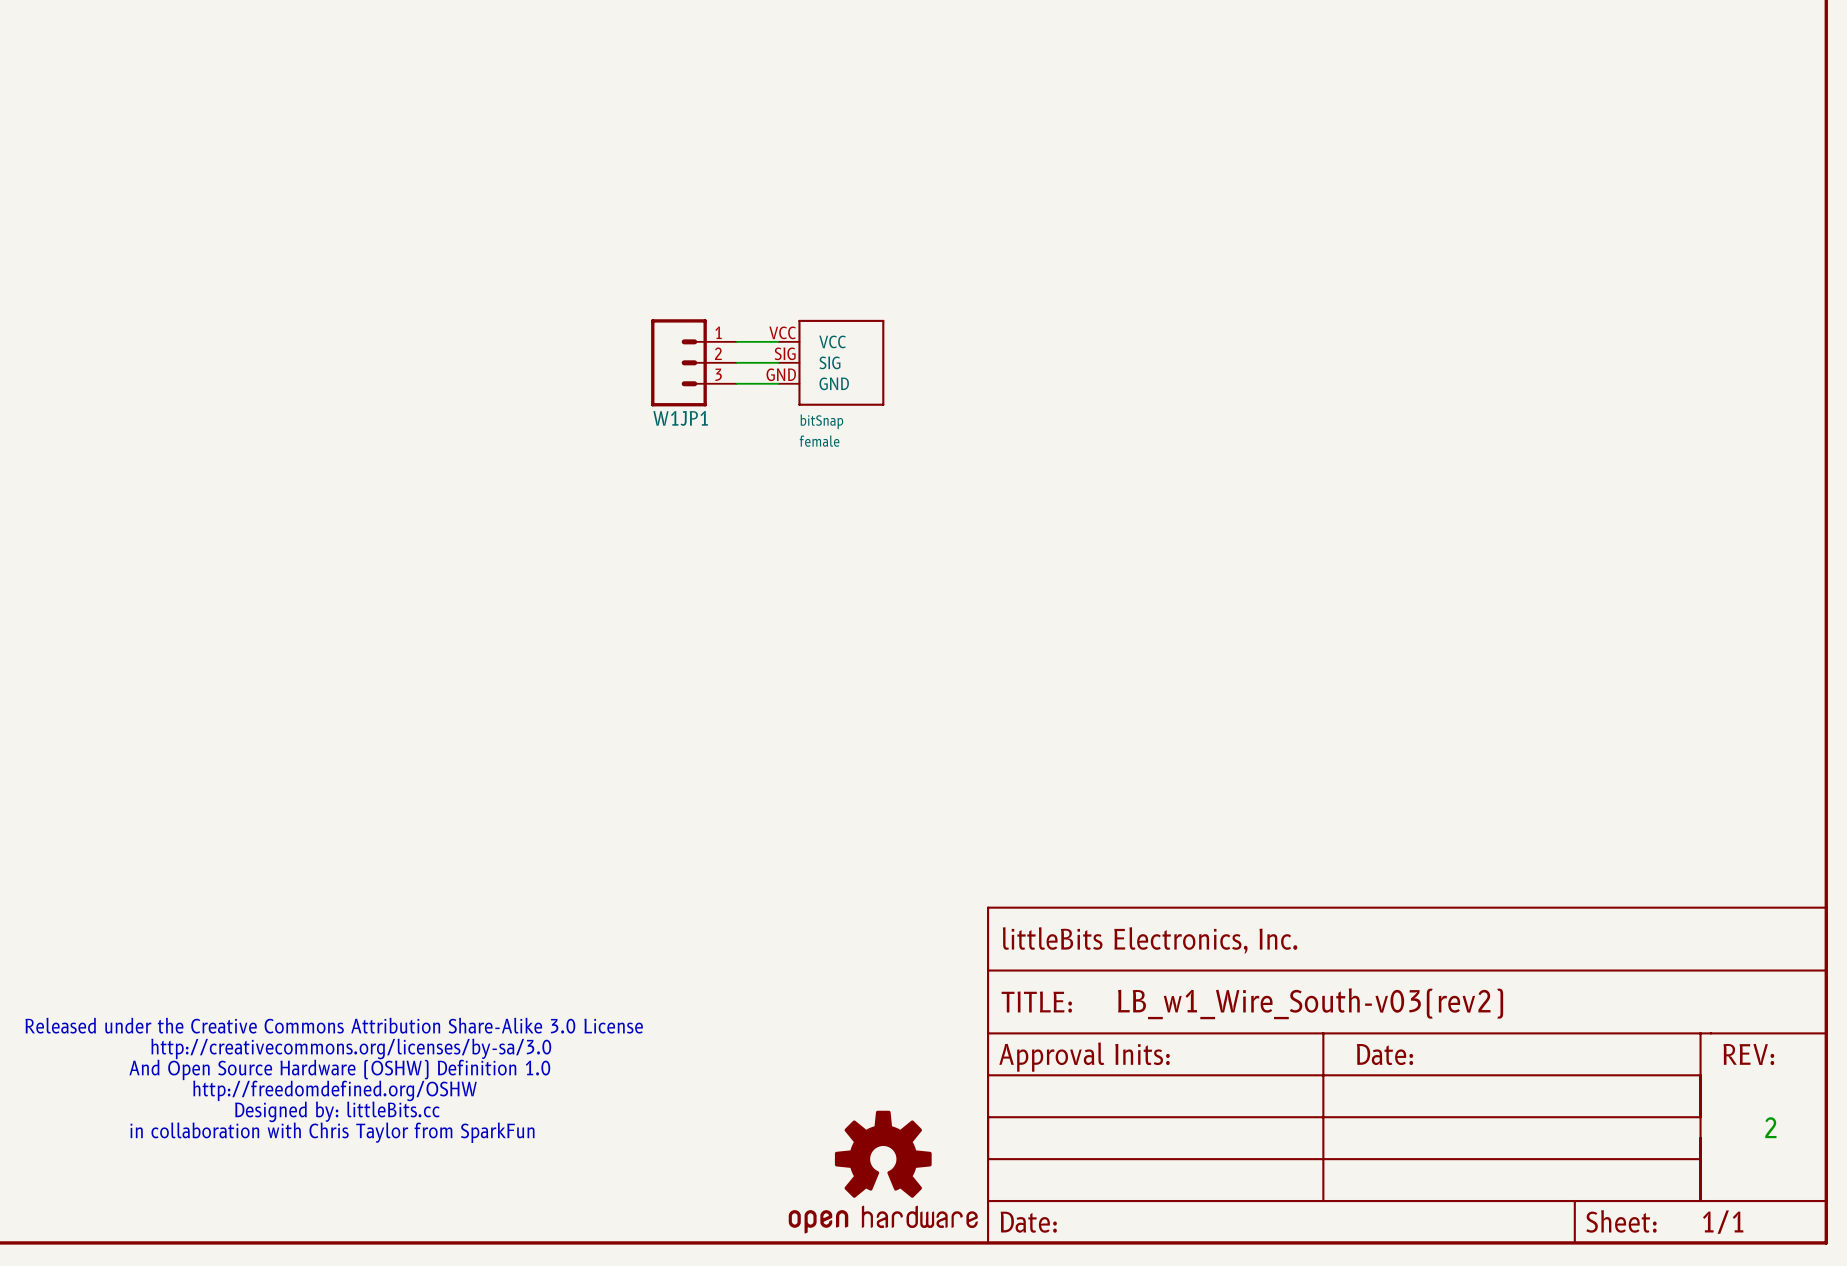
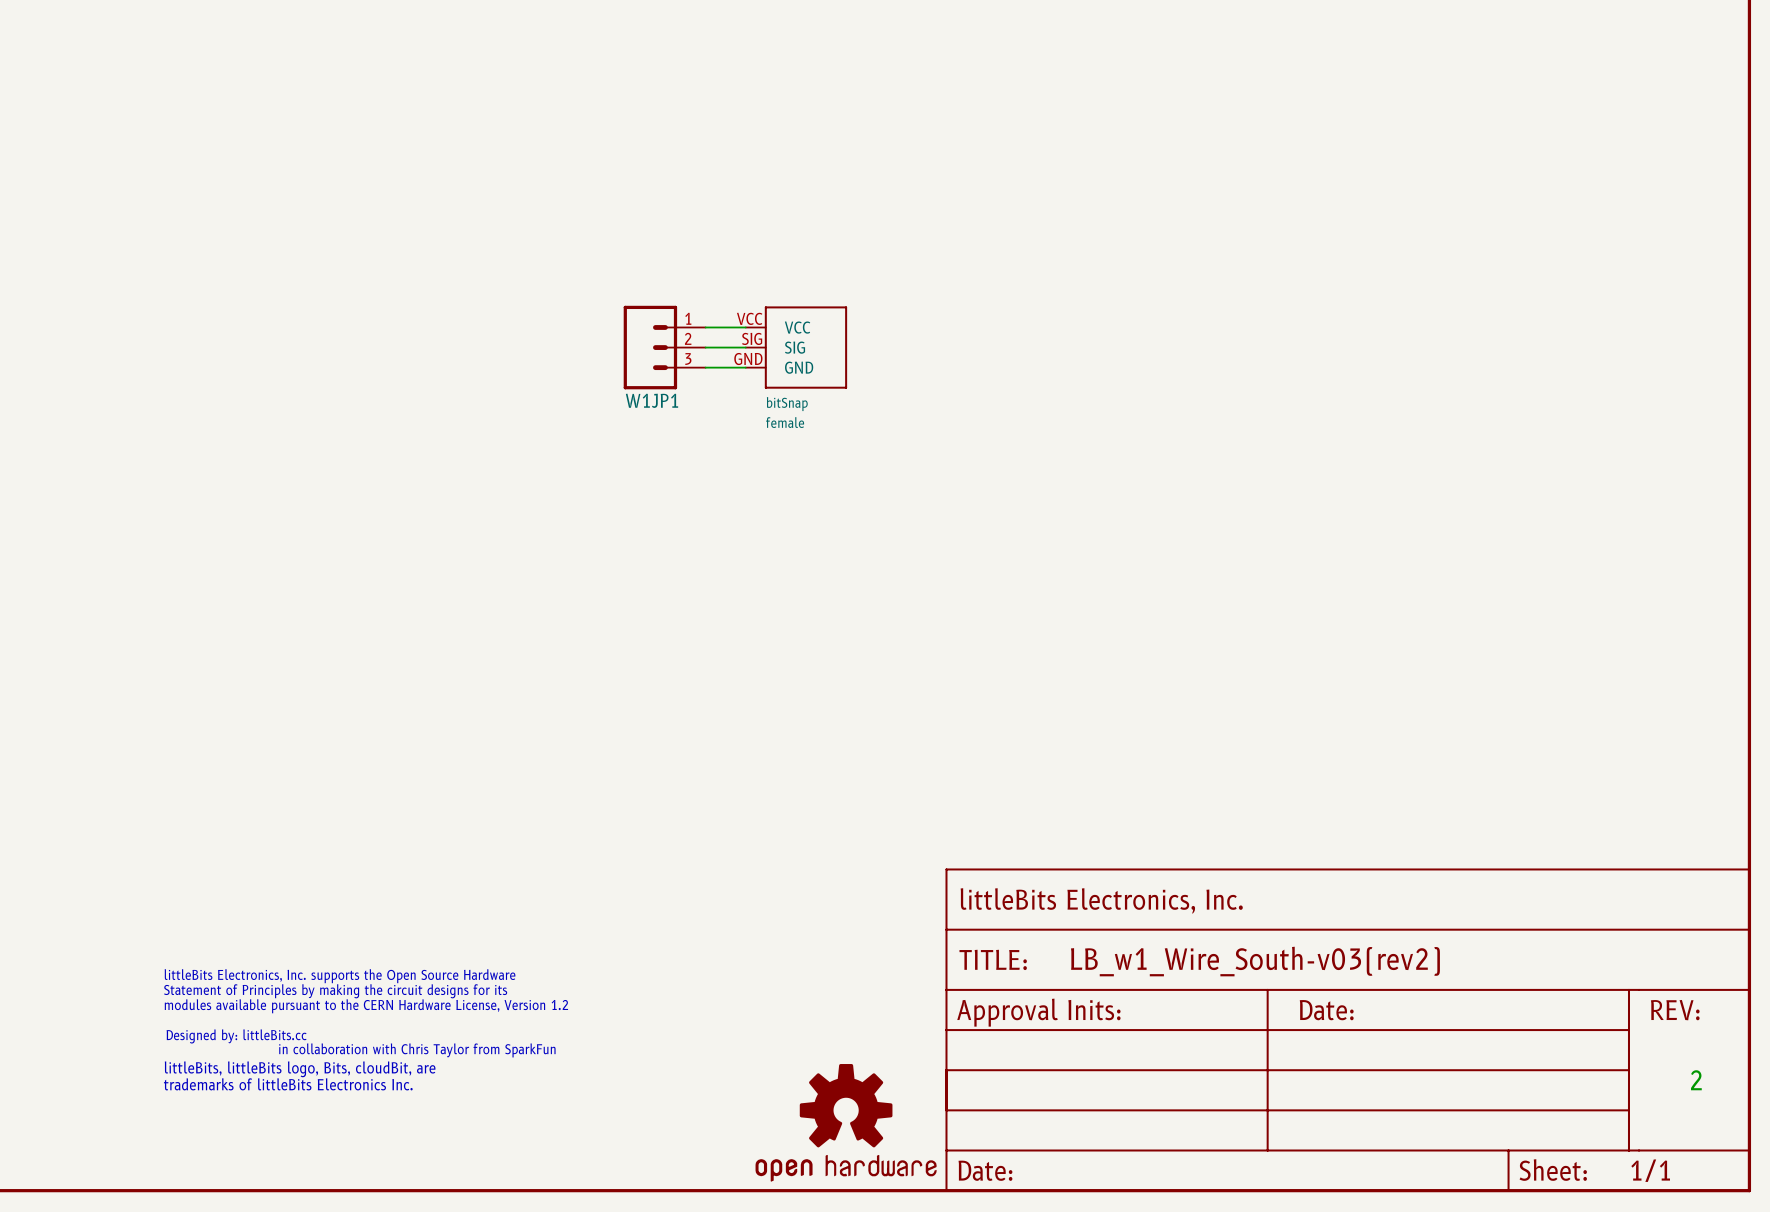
part symbol: [25, 1017, 643, 1143] -> [163, 969, 569, 1091]
text: none -> in collaboration with Chris Taylor from SparkFun (417, 1050)

